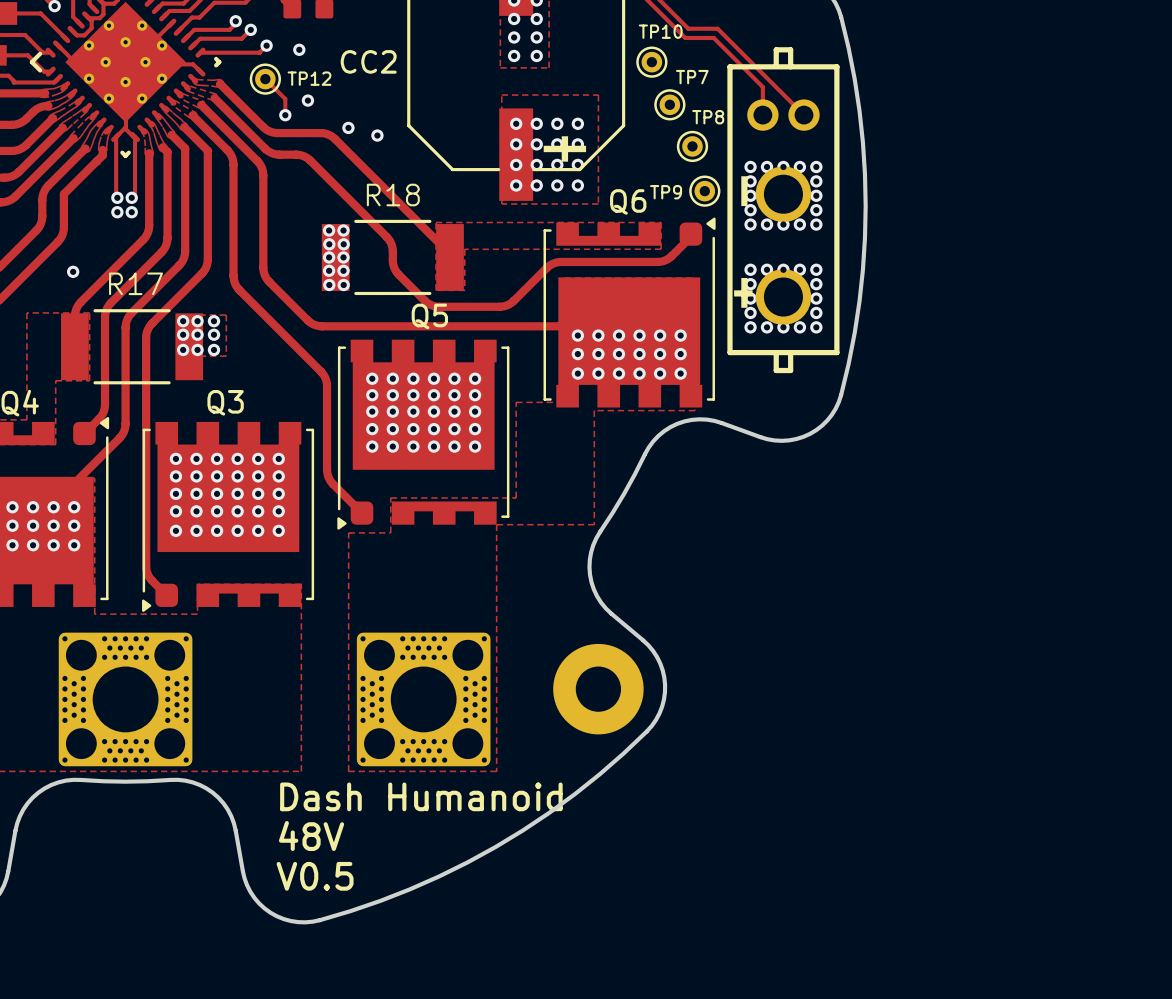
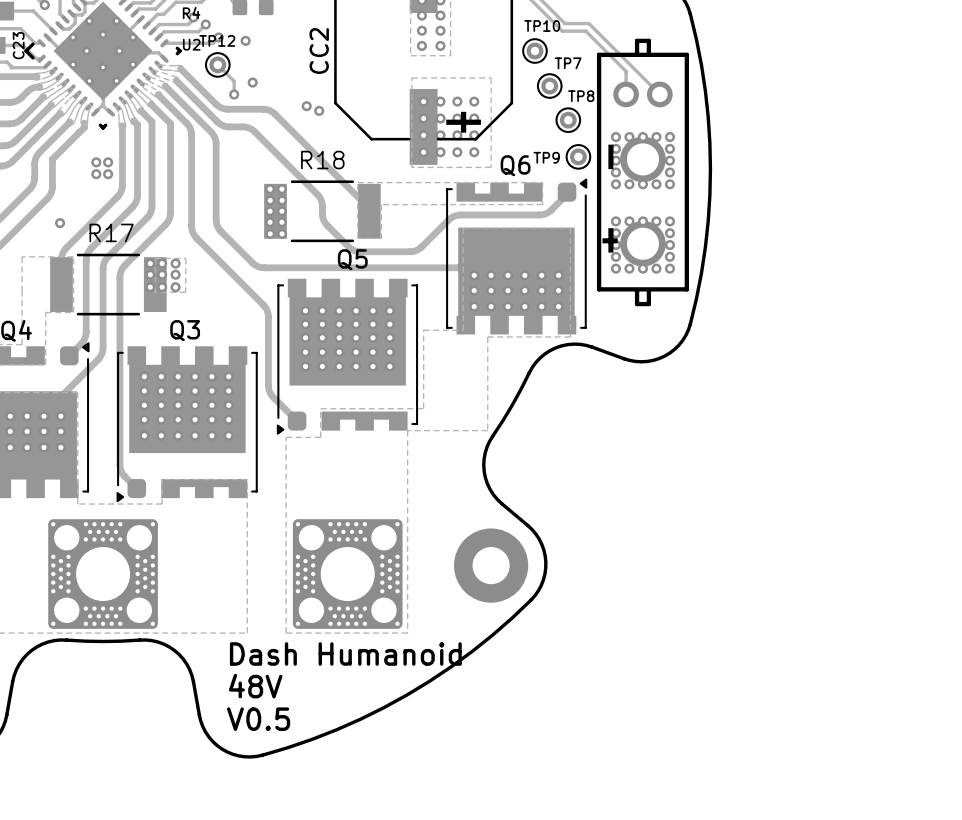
R4 name: none -> R4 (191, 13)
U2 name: none -> U2 (191, 44)
C23 name: none -> C23 (18, 45)
CC2 name rotation: 0° (368, 61) -> 90° counterclockwise (319, 51)
part text position: TP12 (309, 78) -> TP12 (217, 40)
via: (348, 127) -> none
via: none -> (306, 106)
via: (377, 135) -> none
via: none -> (319, 110)
track: (116, 137) (117, 197) -> none
track: (135, 137) (135, 194) (131, 197) -> none

